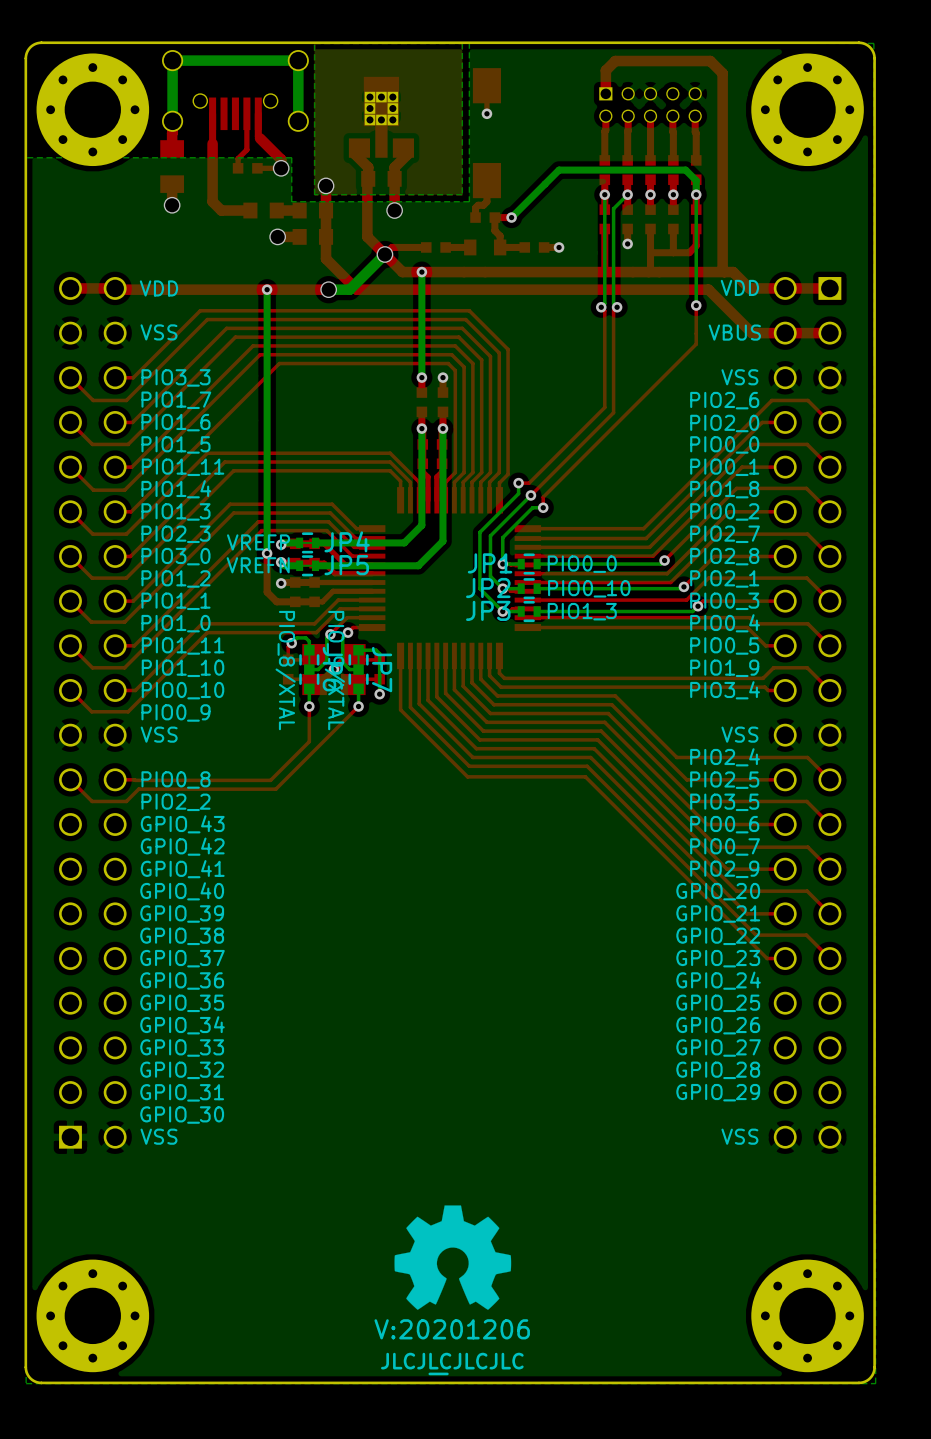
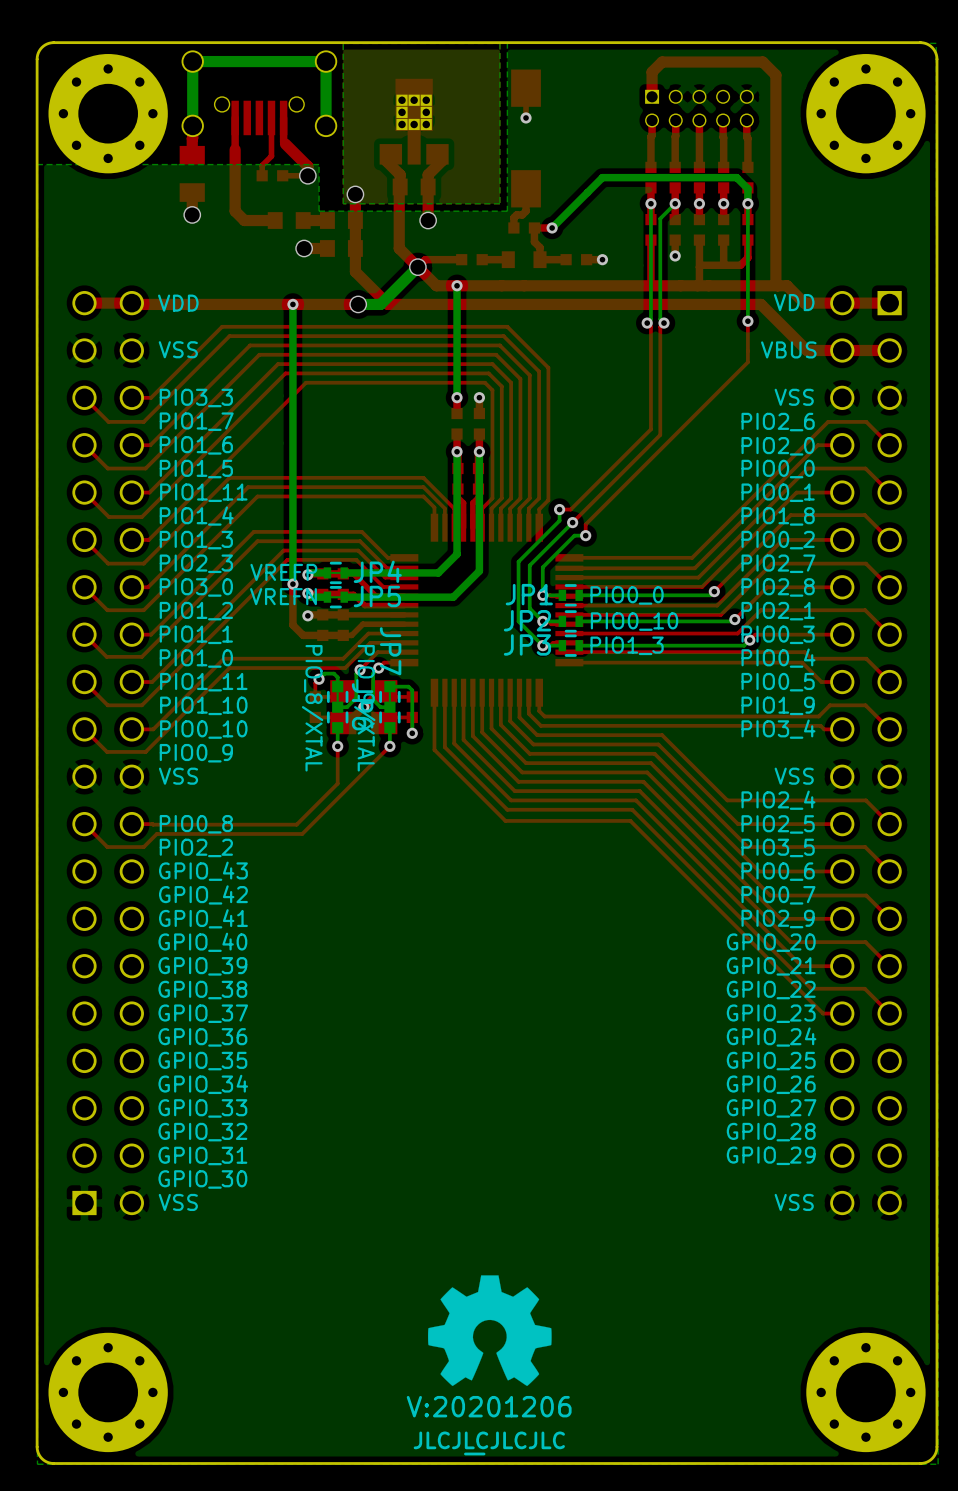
JP7 name position: JP7 (382, 669) -> JP7 (390, 651)

